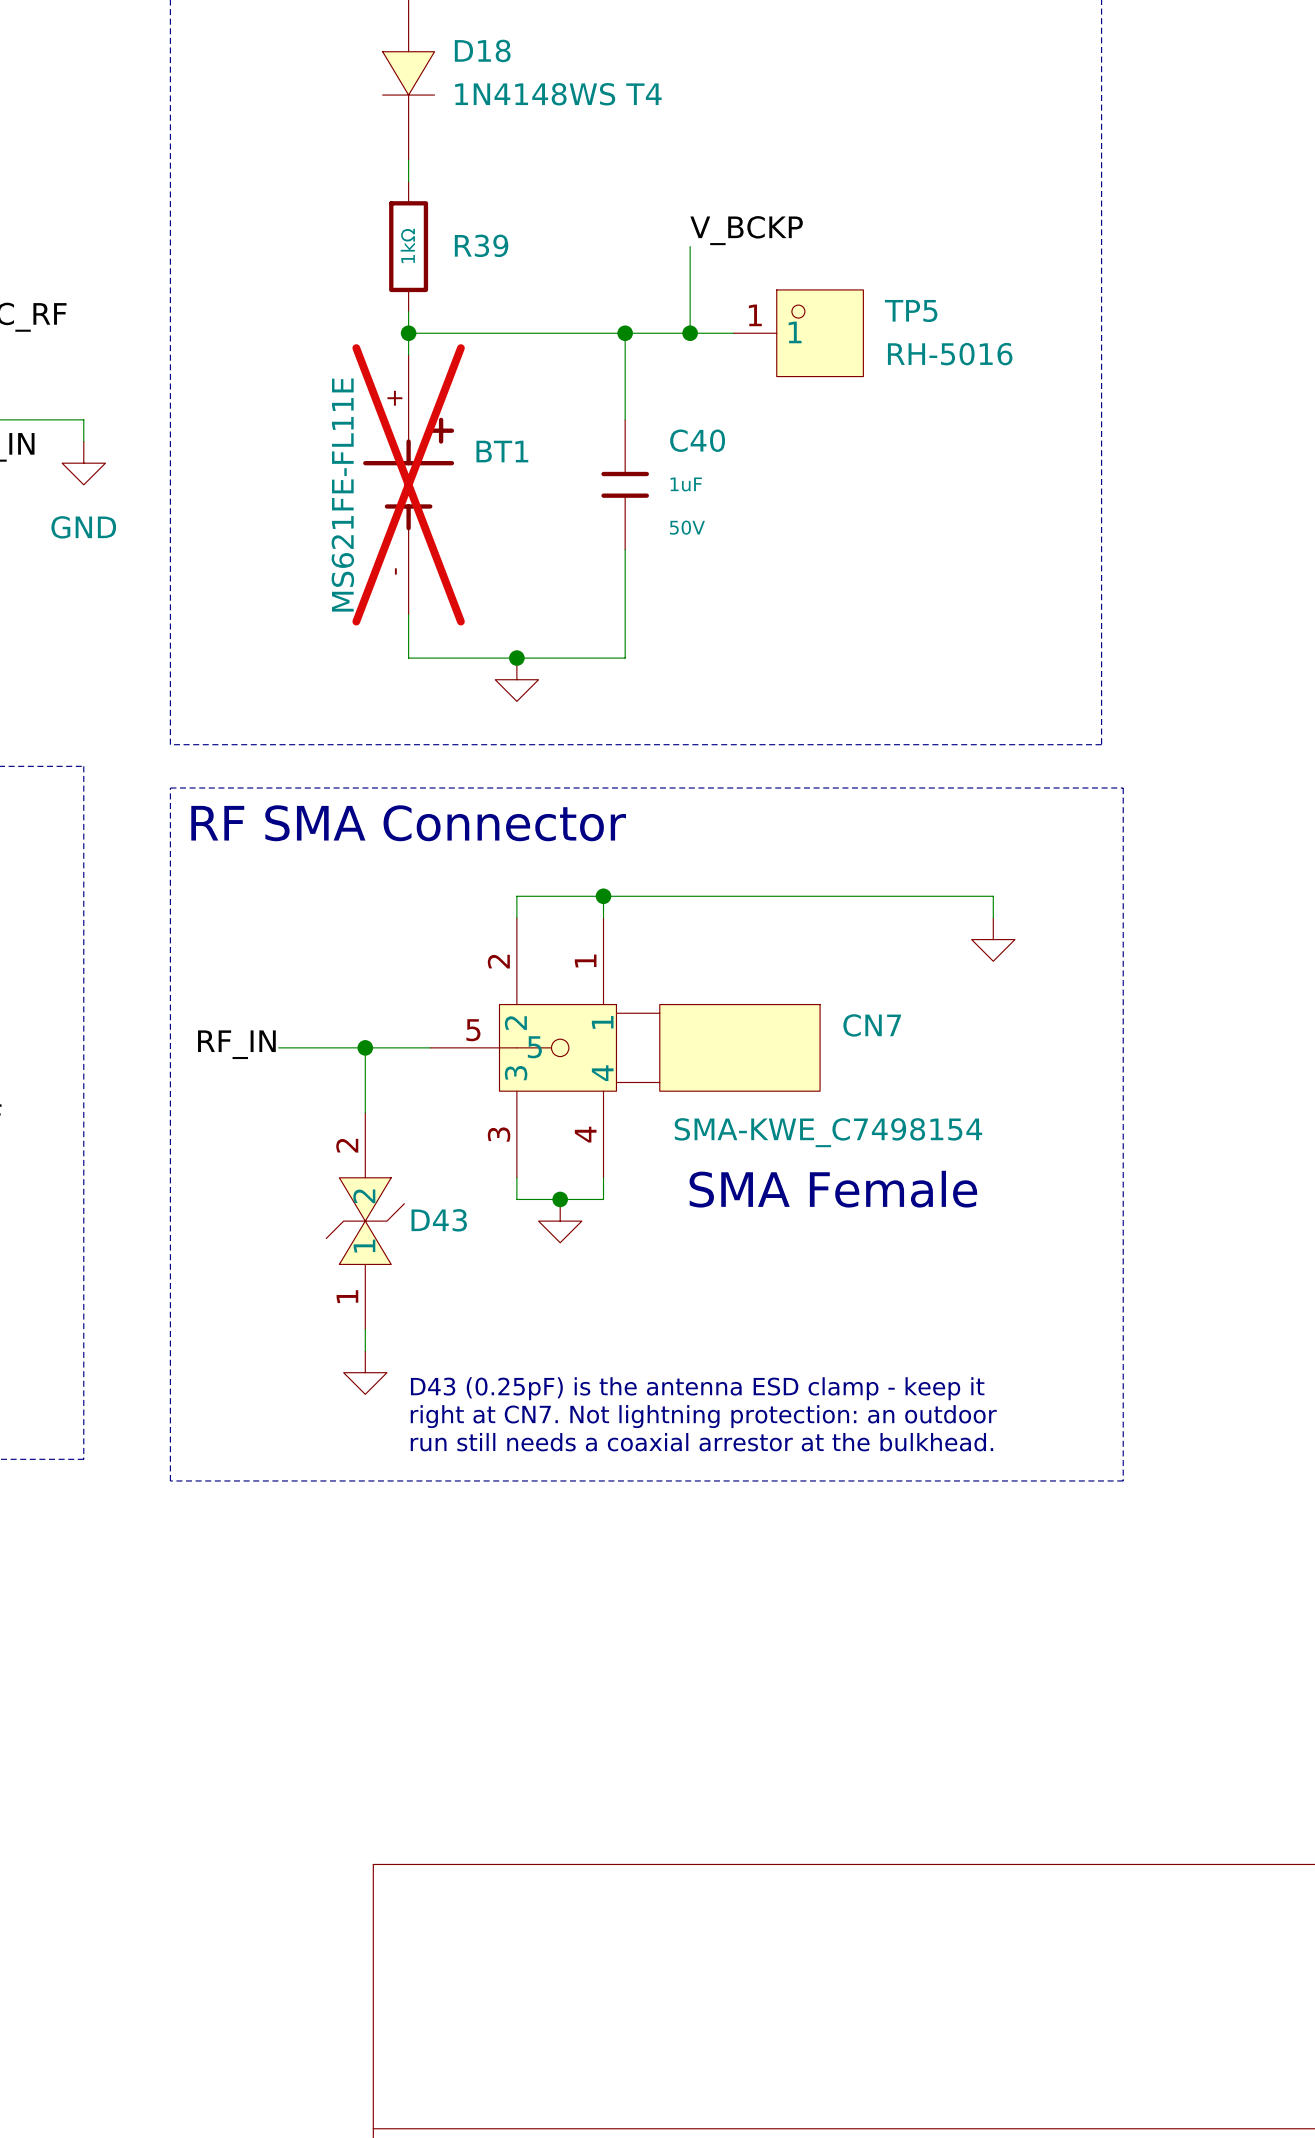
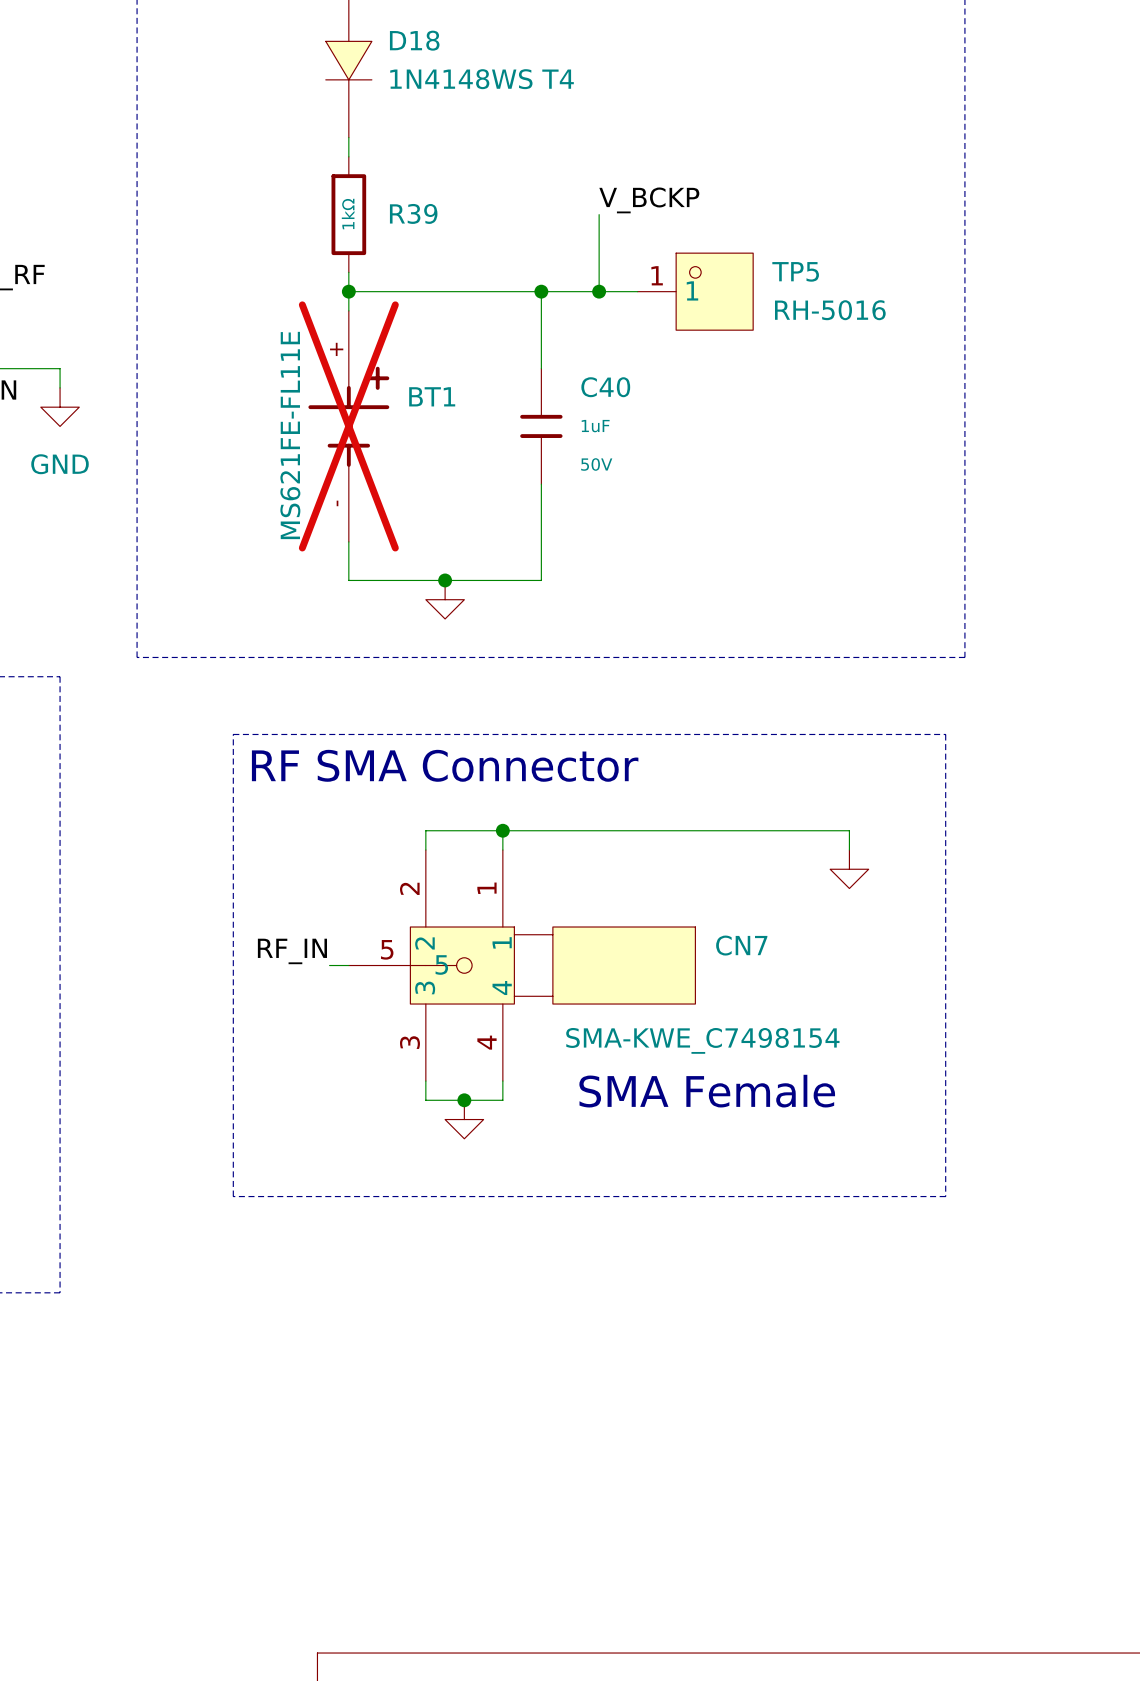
line: (170, 788) (1123, 788) (1123, 1480) (170, 1480) (170, 788) -> (233, 734) (233, 1196) (945, 1196) (945, 734) (233, 734)
text position: RF SMA Connector (408, 823) -> RF SMA Connector (445, 765)
wire: (603, 896) (603, 917) -> (502, 830) (502, 849)
junction position: (603, 896) -> (502, 830)
wire: (516, 917) (516, 896) (993, 896) (993, 917) -> (425, 849) (425, 830) (849, 830) (849, 849)
power symbol position: (993, 939) -> (849, 869)
label position: RF_IN (236, 1044) -> RF_IN (292, 951)
wire: (278, 1047) (430, 1047) -> none
wire: (365, 1047) (365, 1112) -> none
junction: (365, 1047) -> none
CN7 position: (625, 1047) -> (522, 965)
wire: none -> (329, 965) (348, 965)
wire: (516, 1177) (516, 1199) (603, 1199) (603, 1177) -> (425, 1081) (425, 1100) (502, 1100) (502, 1081)
text position: SMA Female (833, 1189) -> SMA Female (707, 1091)
junction position: (560, 1199) -> (464, 1100)
D43: (365, 1221) -> none
power symbol position: (560, 1221) -> (464, 1119)
wire: (365, 1329) (365, 1351) -> none
power symbol: (365, 1372) -> none
text: D43 (0.25pF) is the antenna ESD clamp - keep it (697, 1388) -> none
text: right at CN7. Not lightning protection: an outdoor (703, 1416) -> none
text: run still needs a coaxial arrestor at the bulkhead. (701, 1442) -> none

